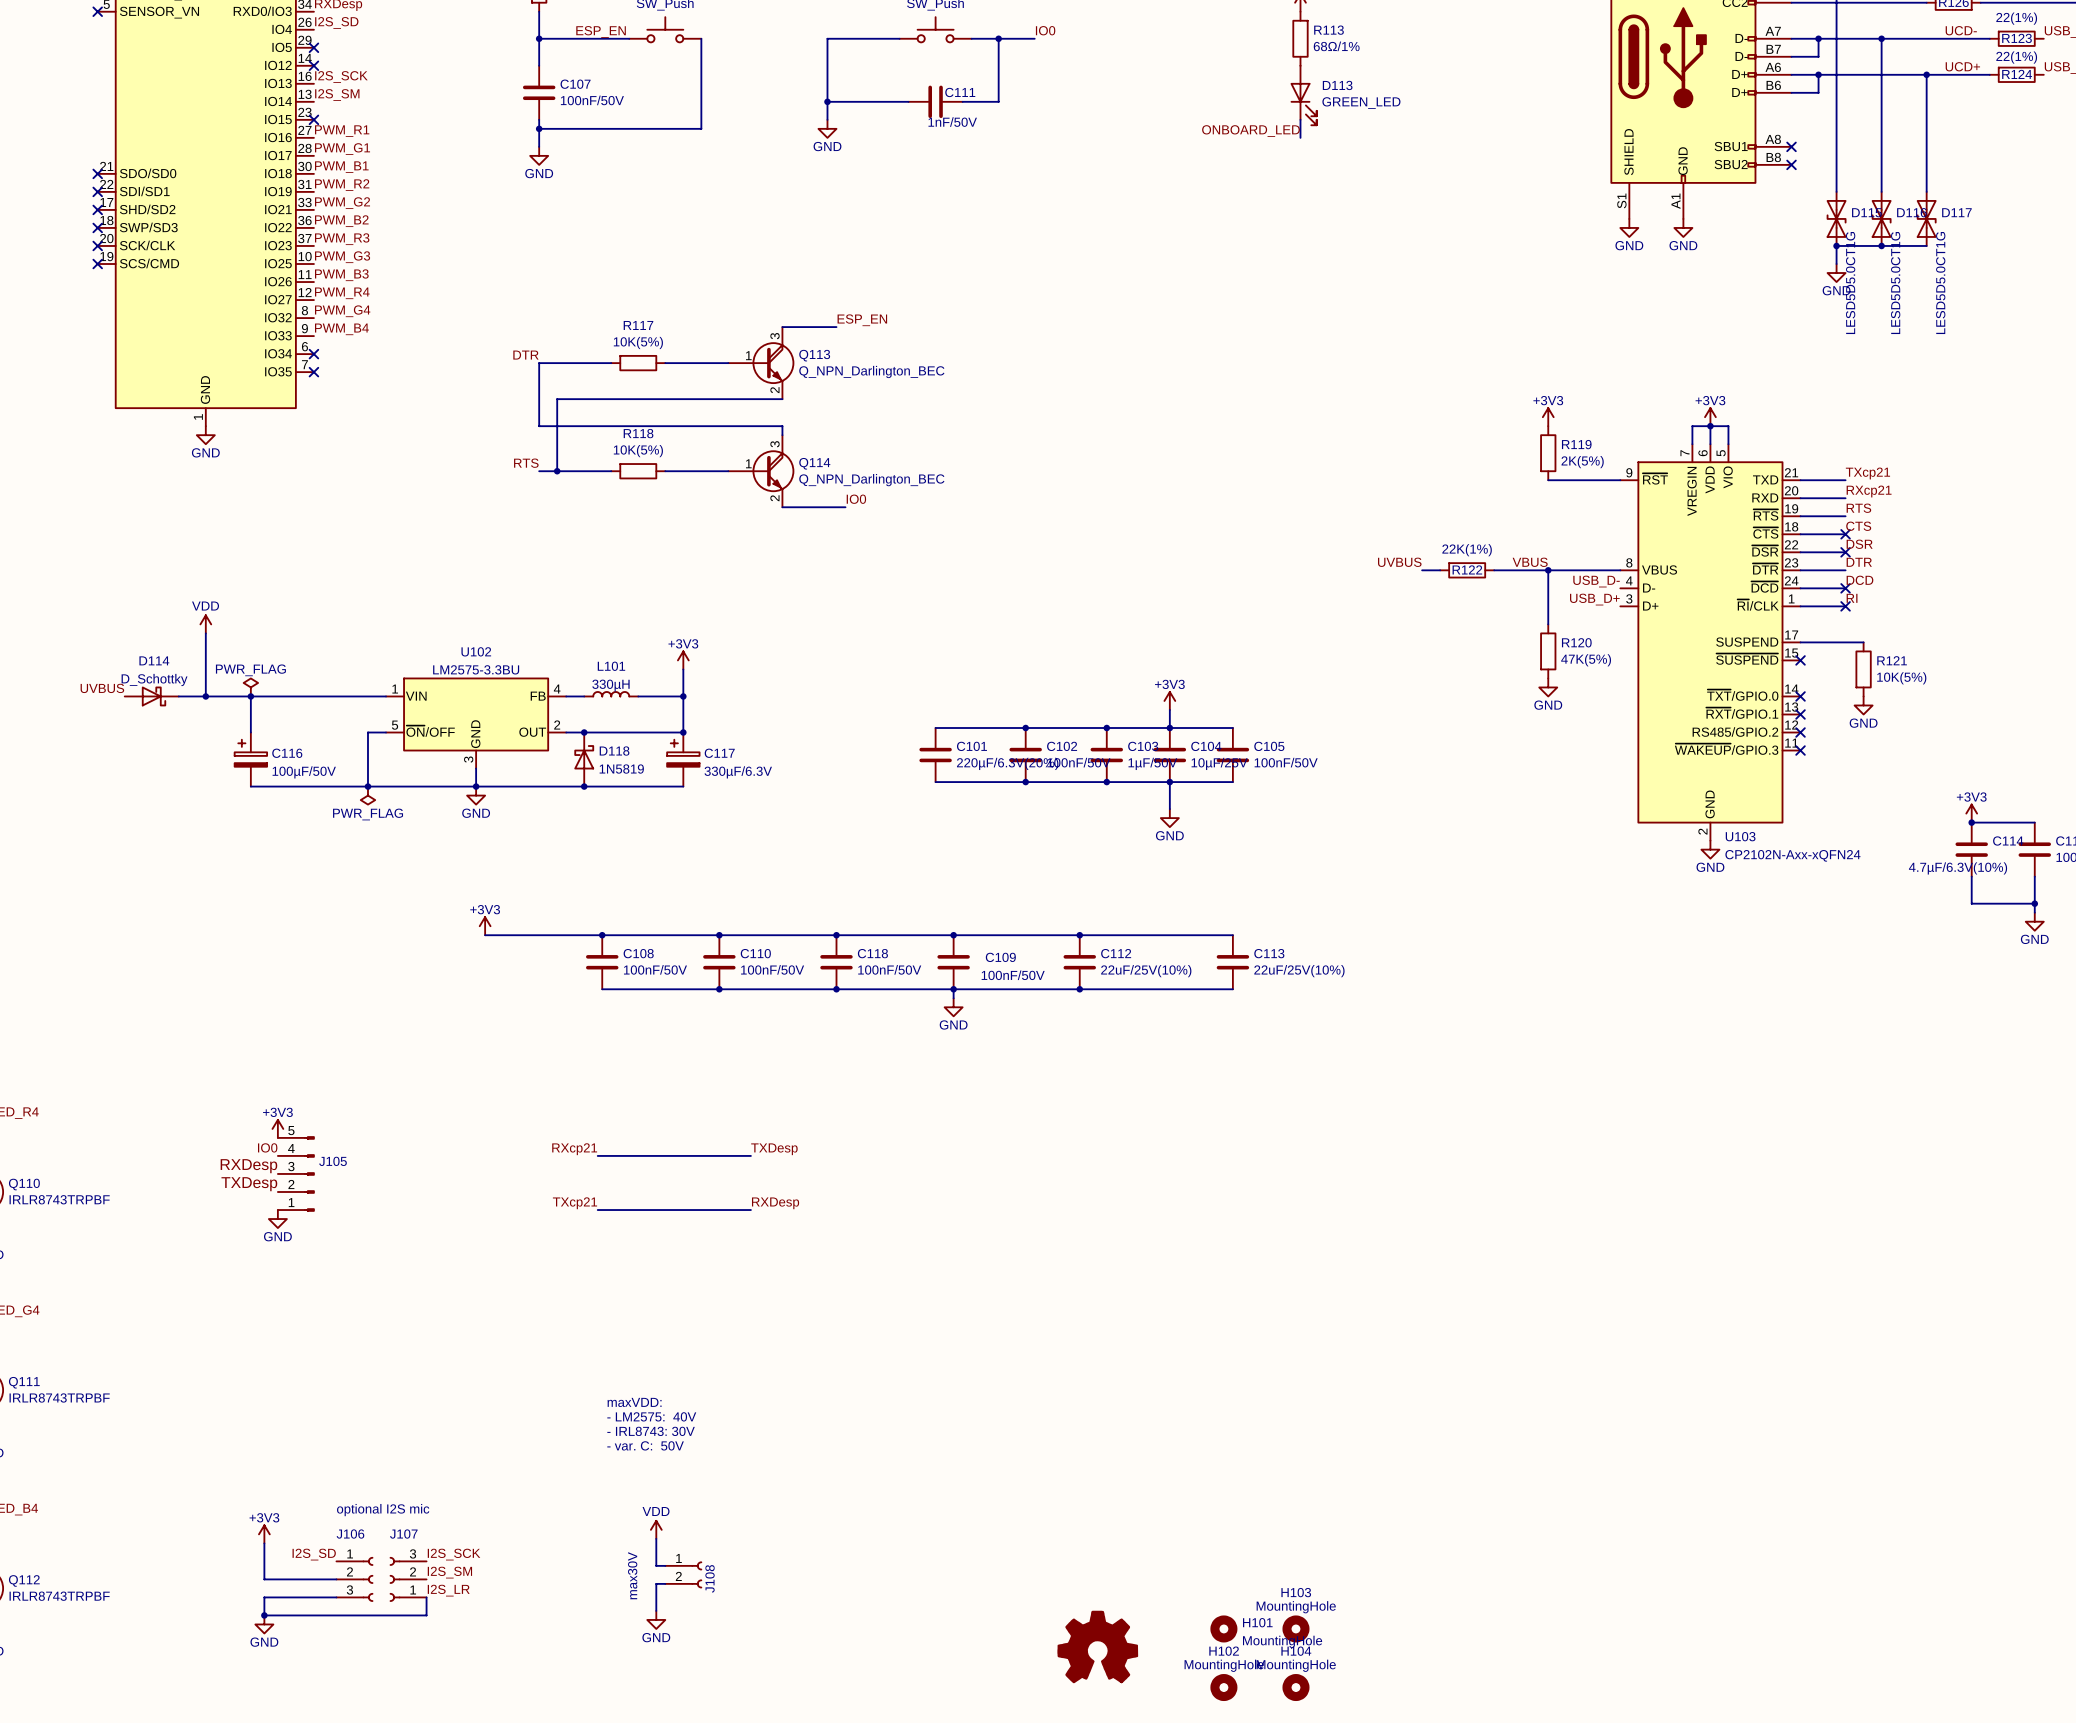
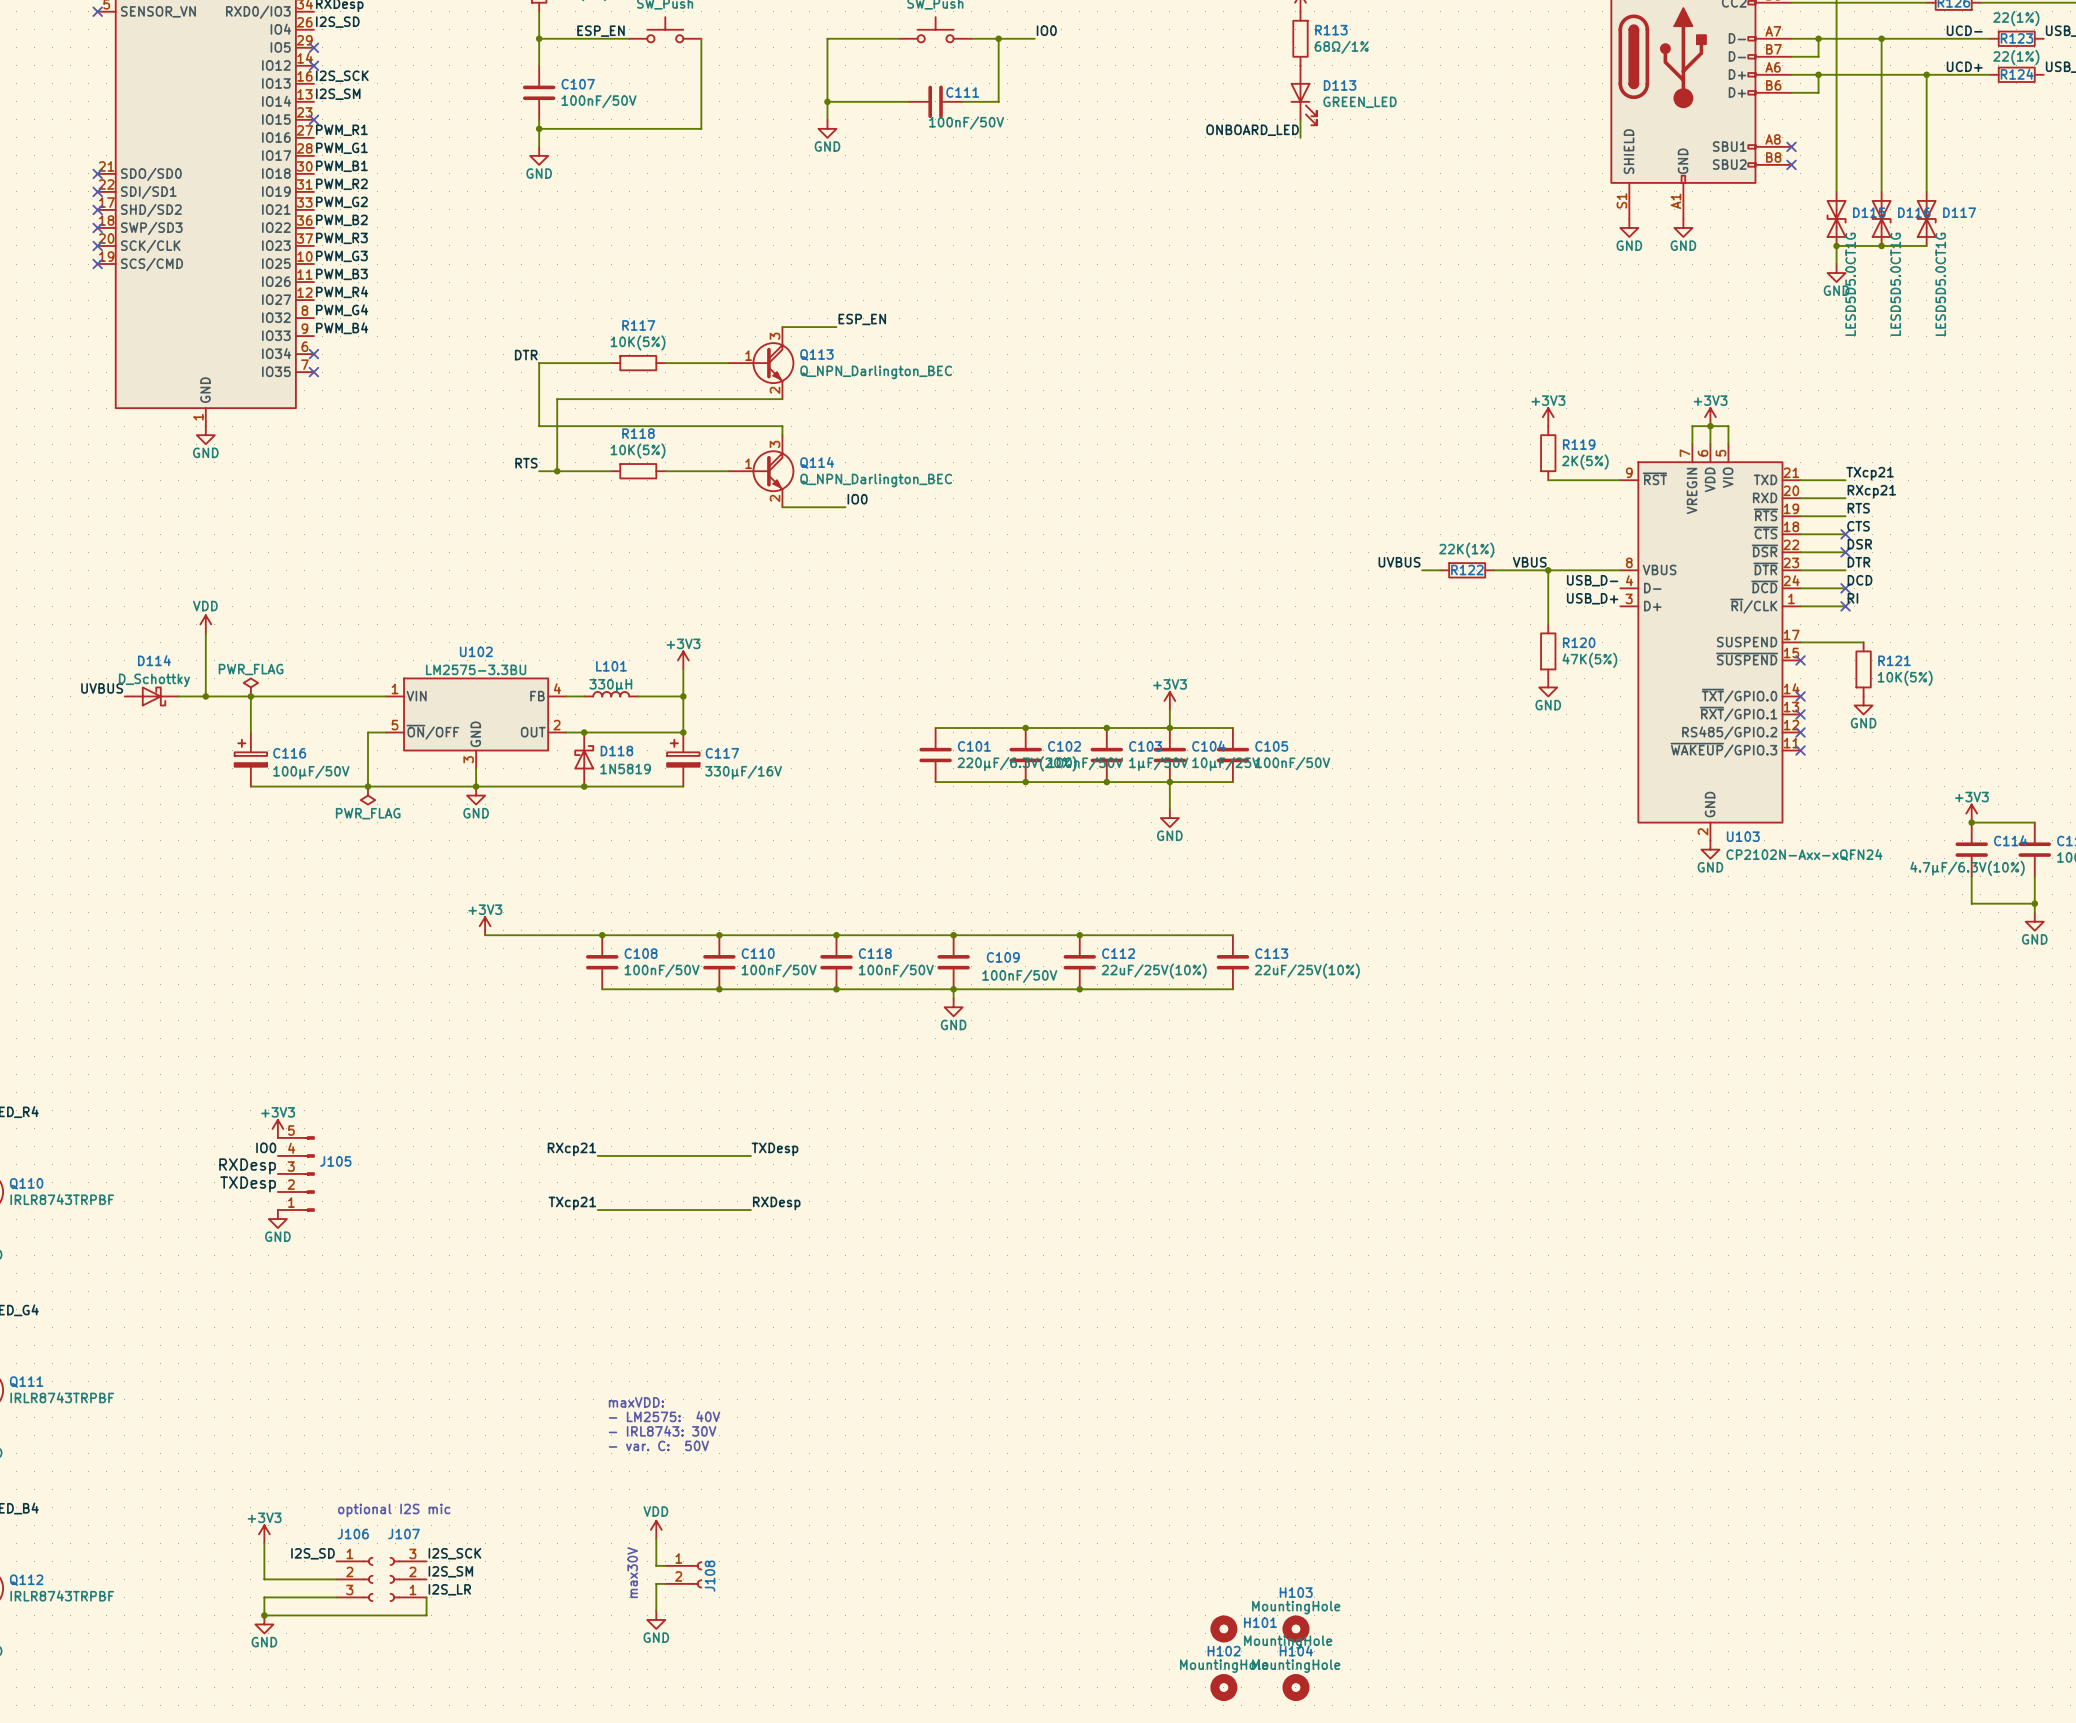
C111 value: 1nF/50V (952, 122) -> 100nF/50V (966, 123)
C117 value: 330µF/6.3V (738, 772) -> 330µF/16V (743, 772)
part: (1097, 1646) -> none

